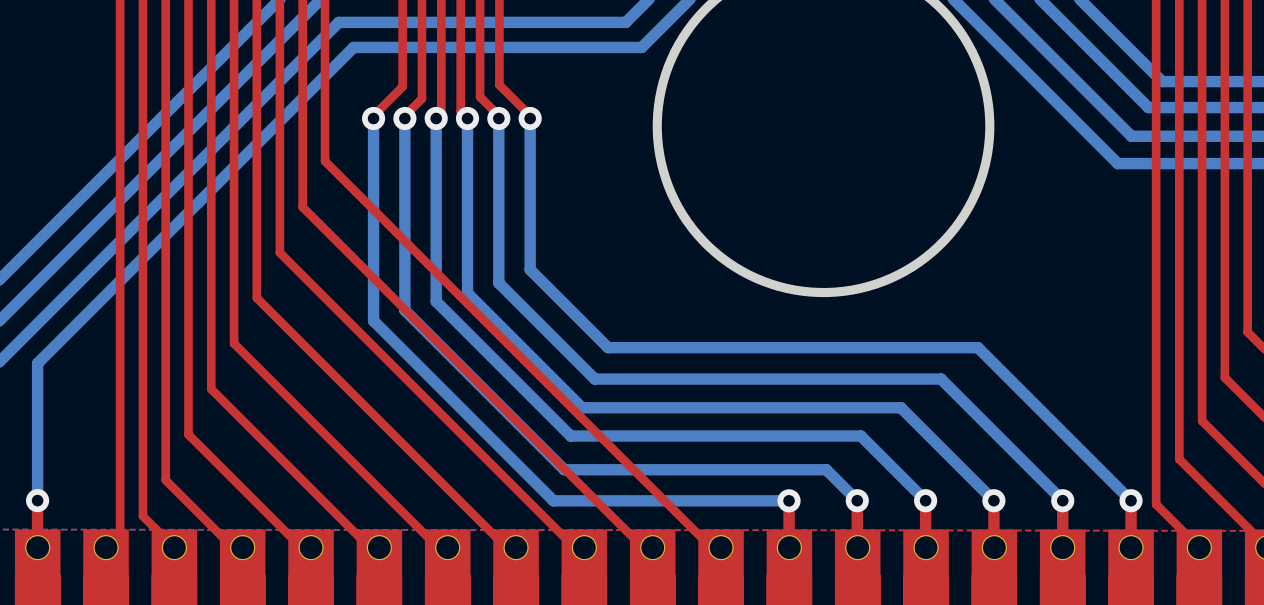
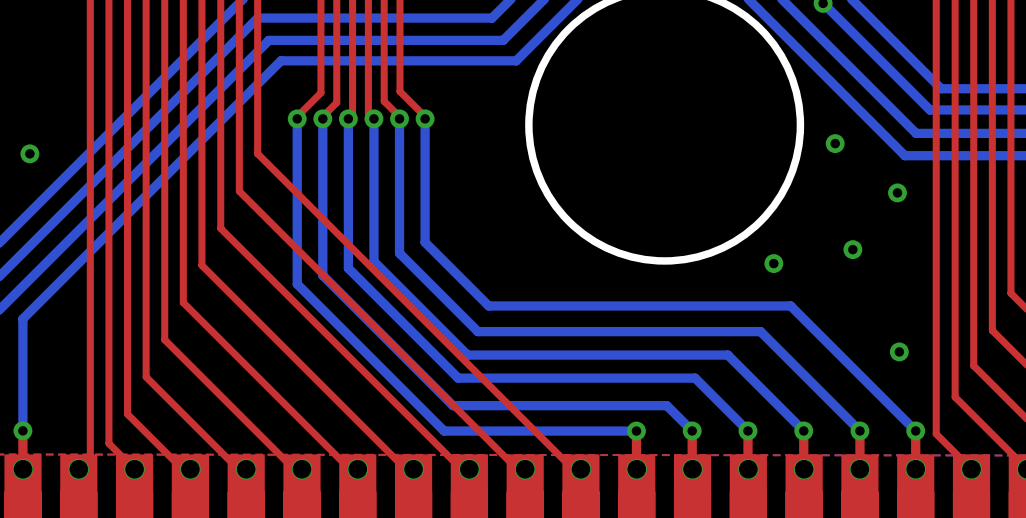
via: none -> (835, 143)
via: none -> (29, 153)
via: none -> (897, 192)
via: none -> (852, 249)
via: none -> (773, 263)
via: none -> (899, 351)

